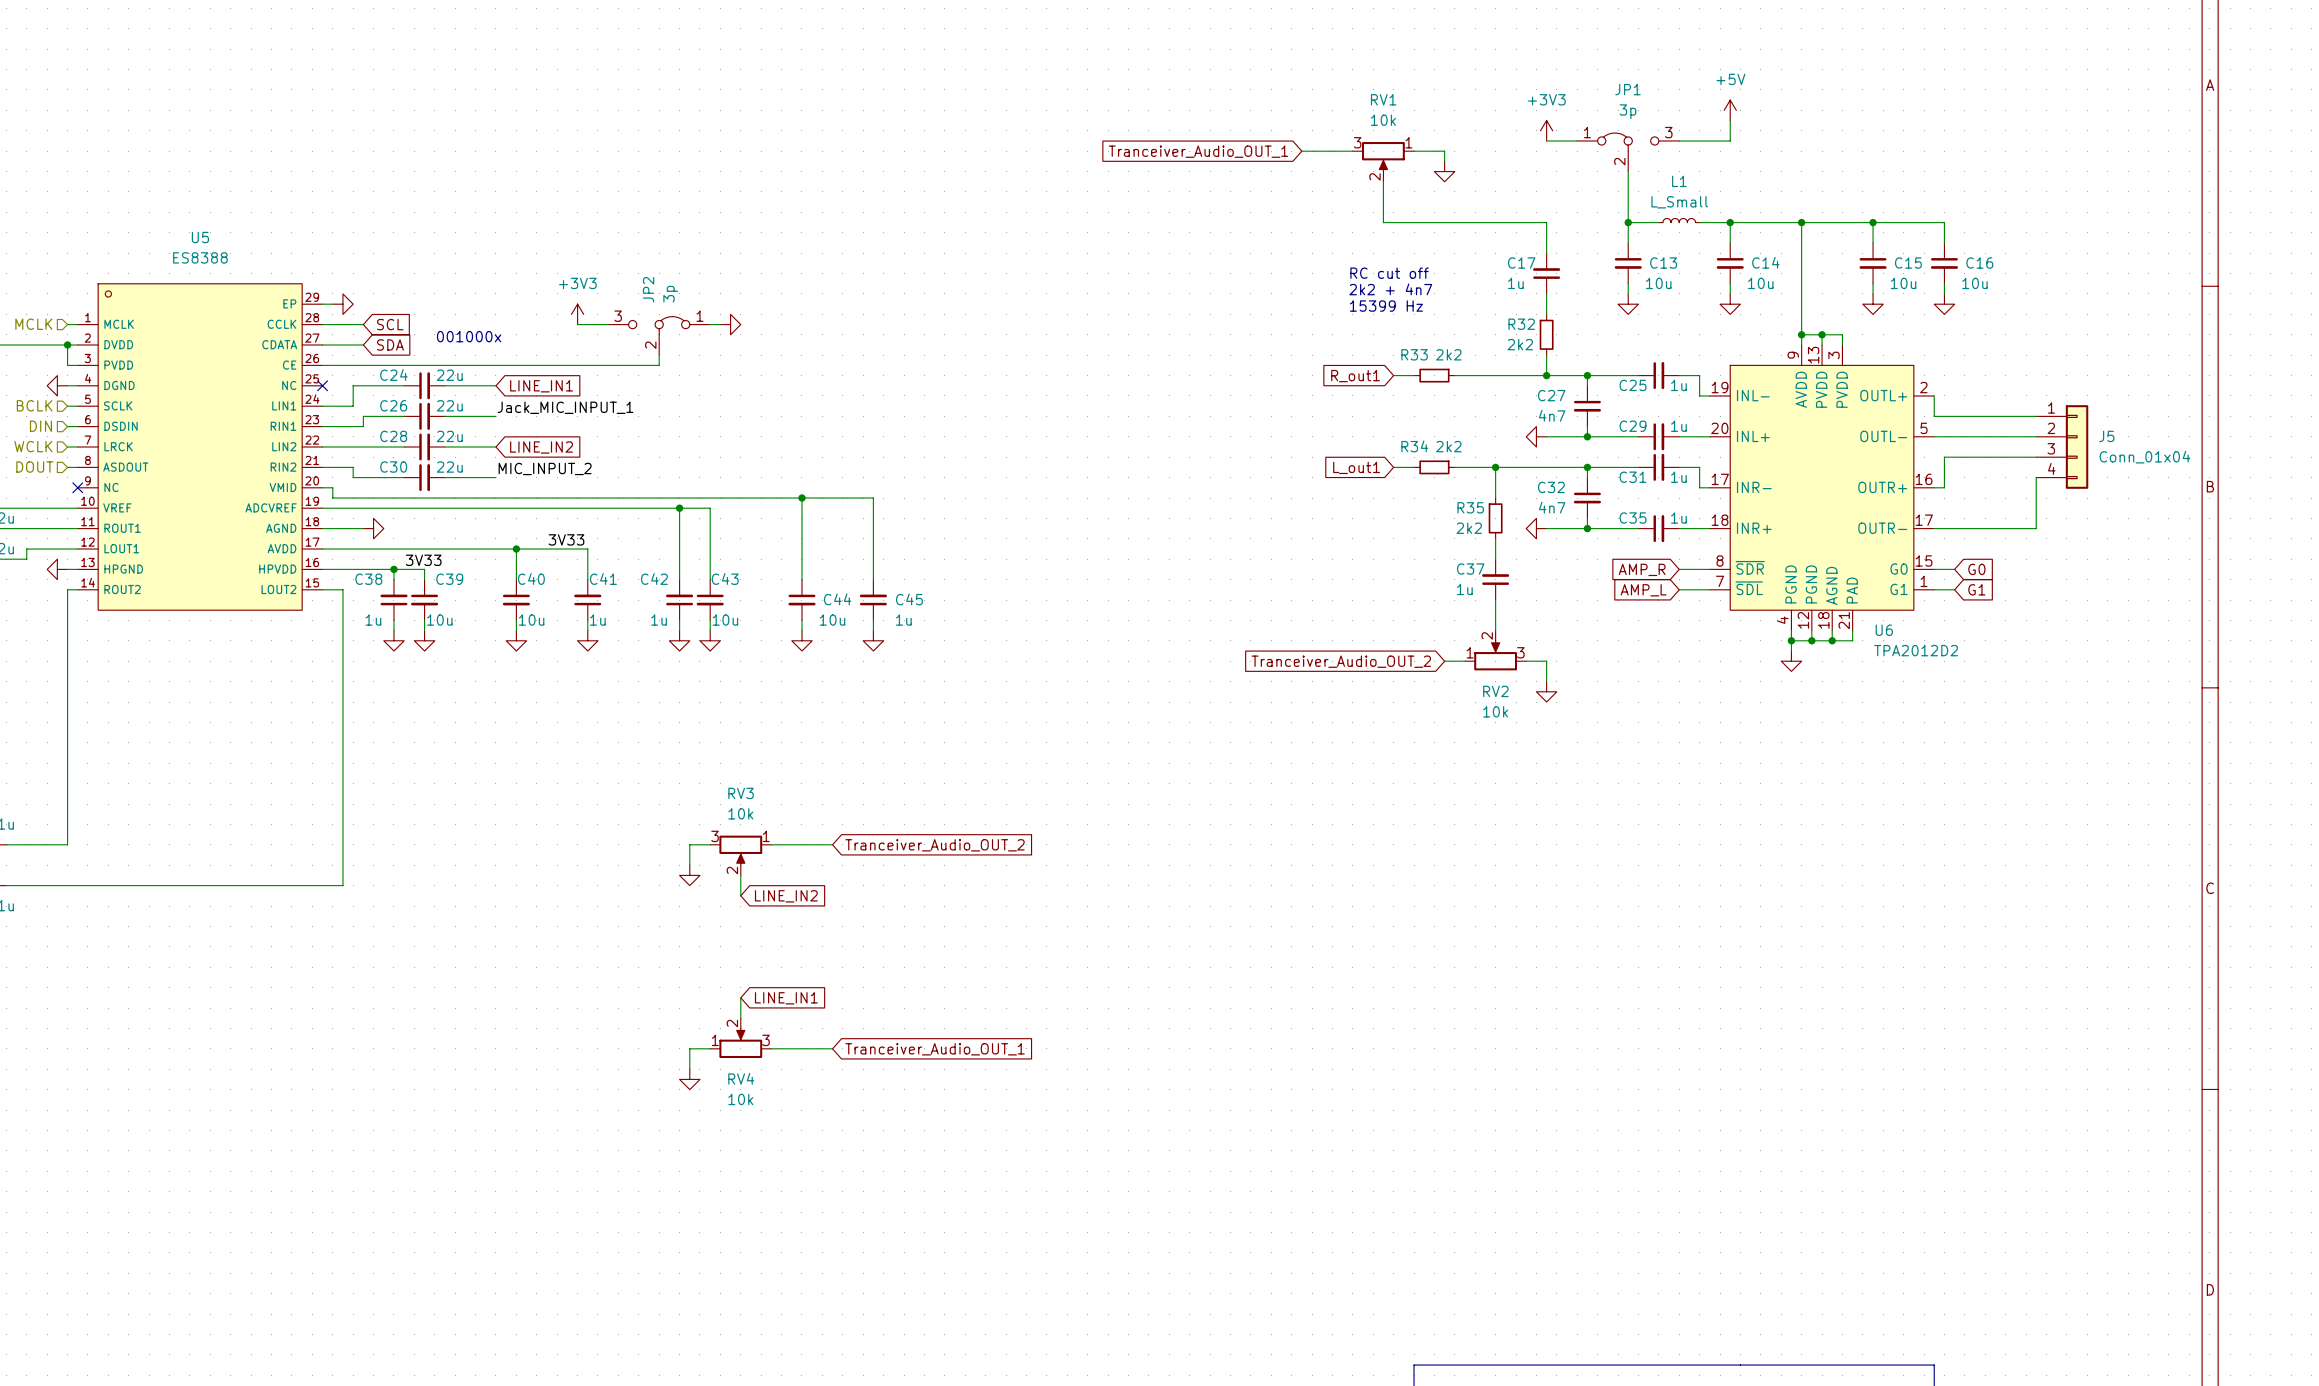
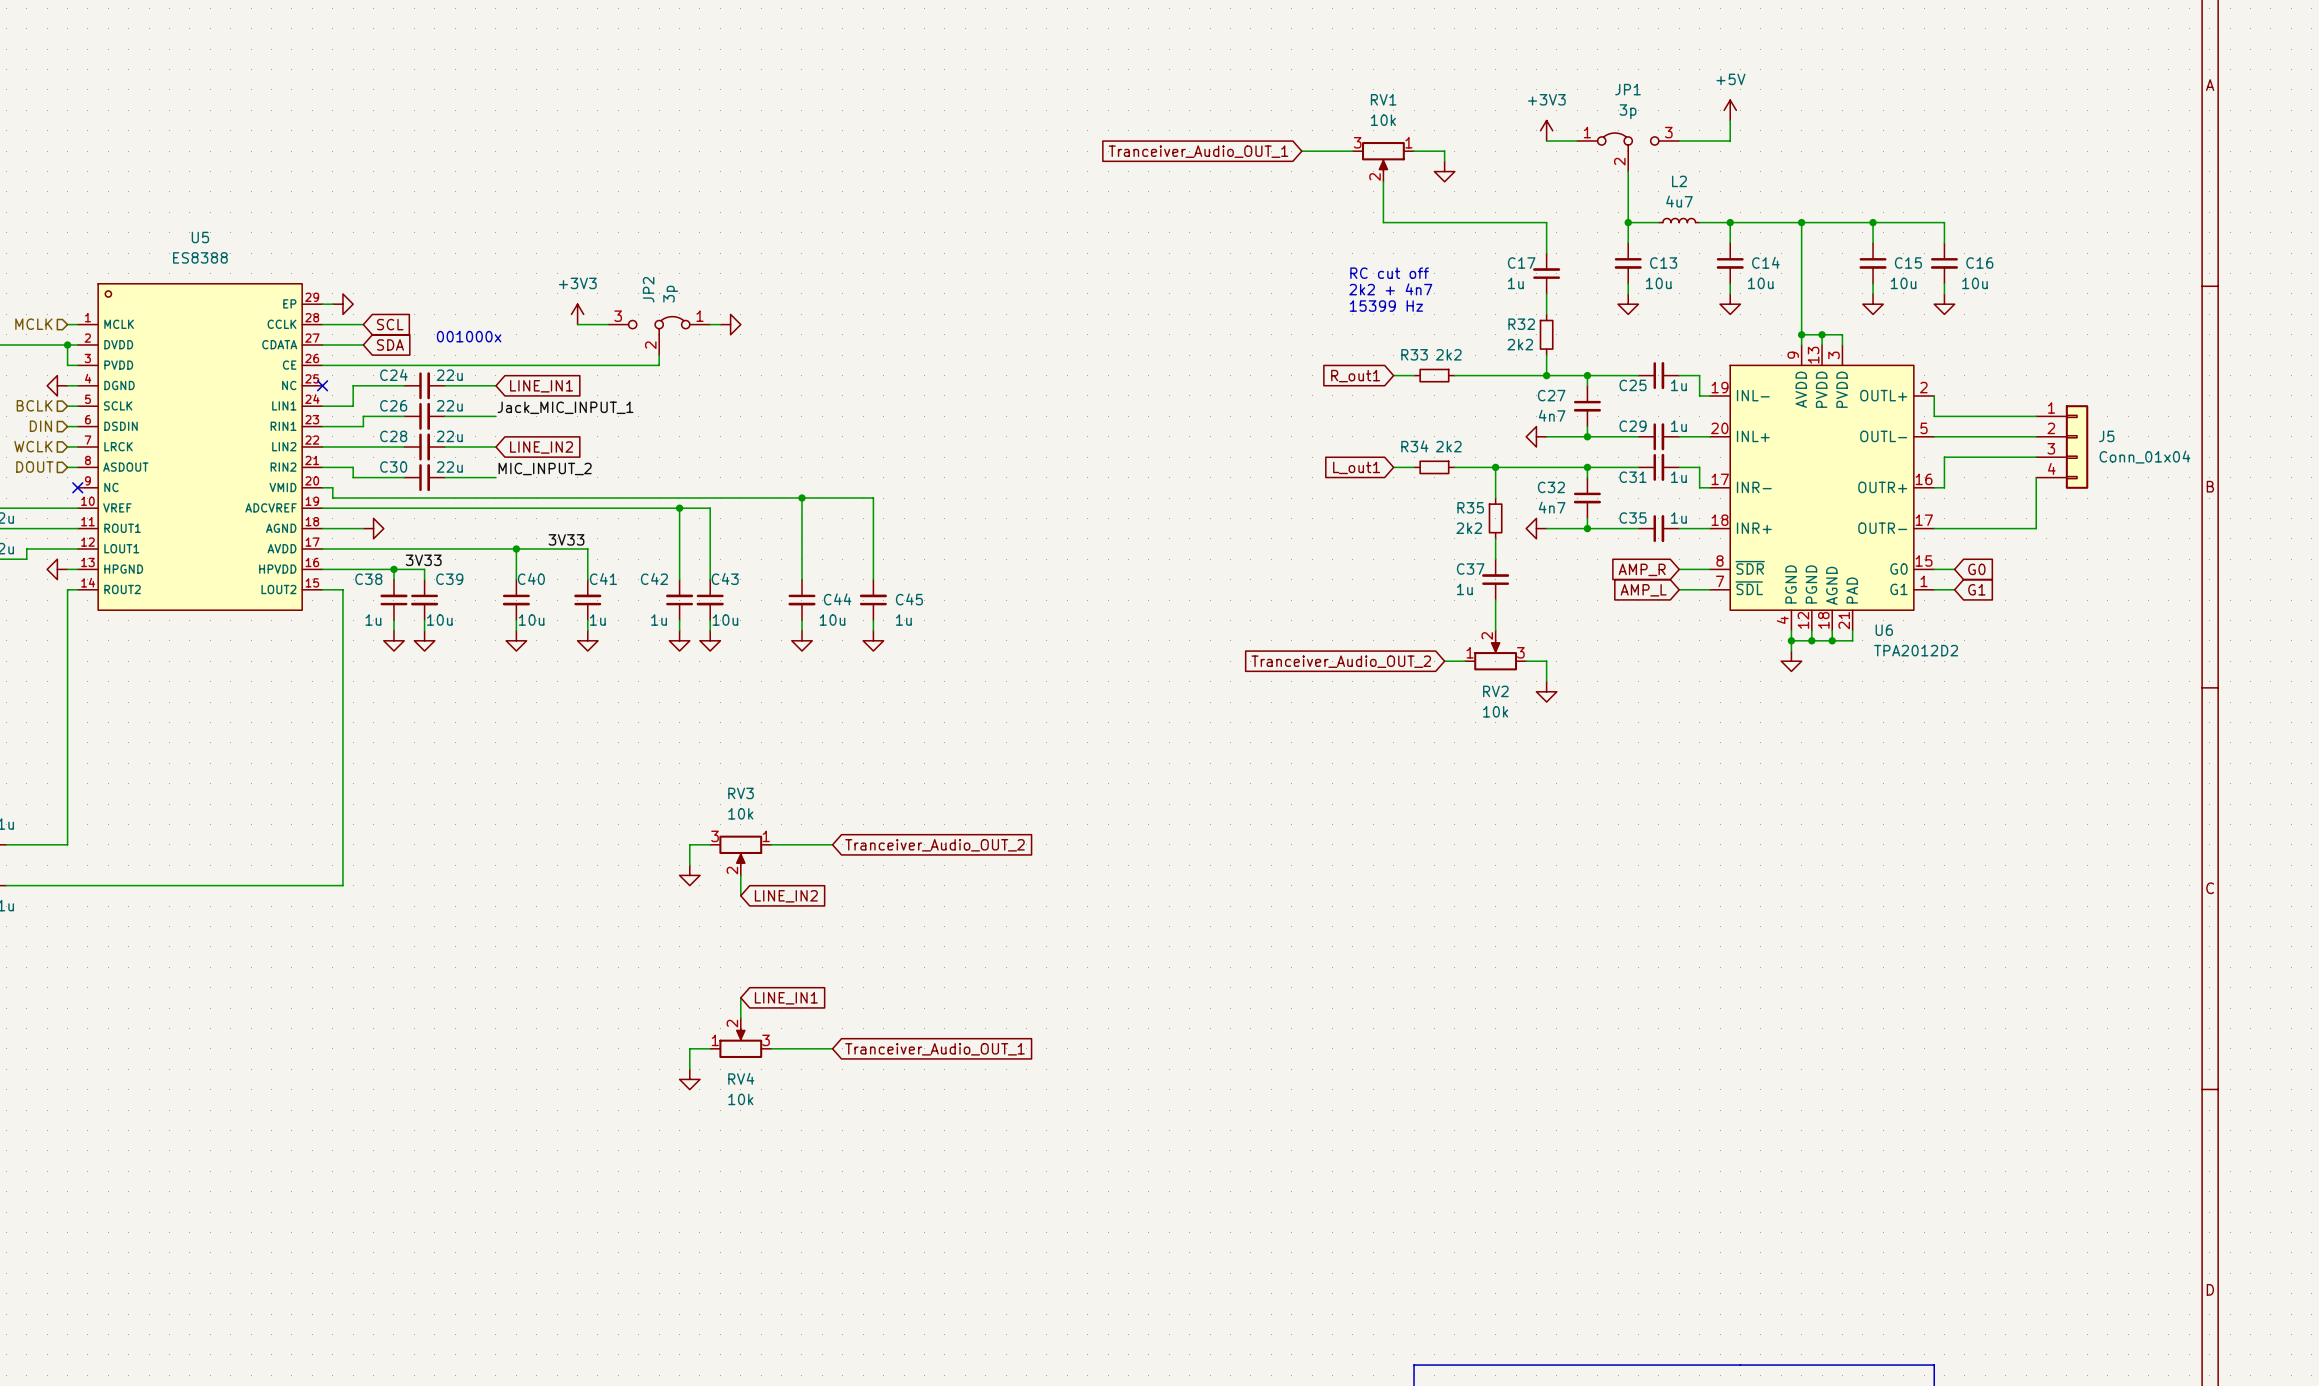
L1 name: L1 (1679, 181) -> L2 (1679, 181)
L1 value: L_Small (1679, 202) -> 4u7 (1679, 201)

